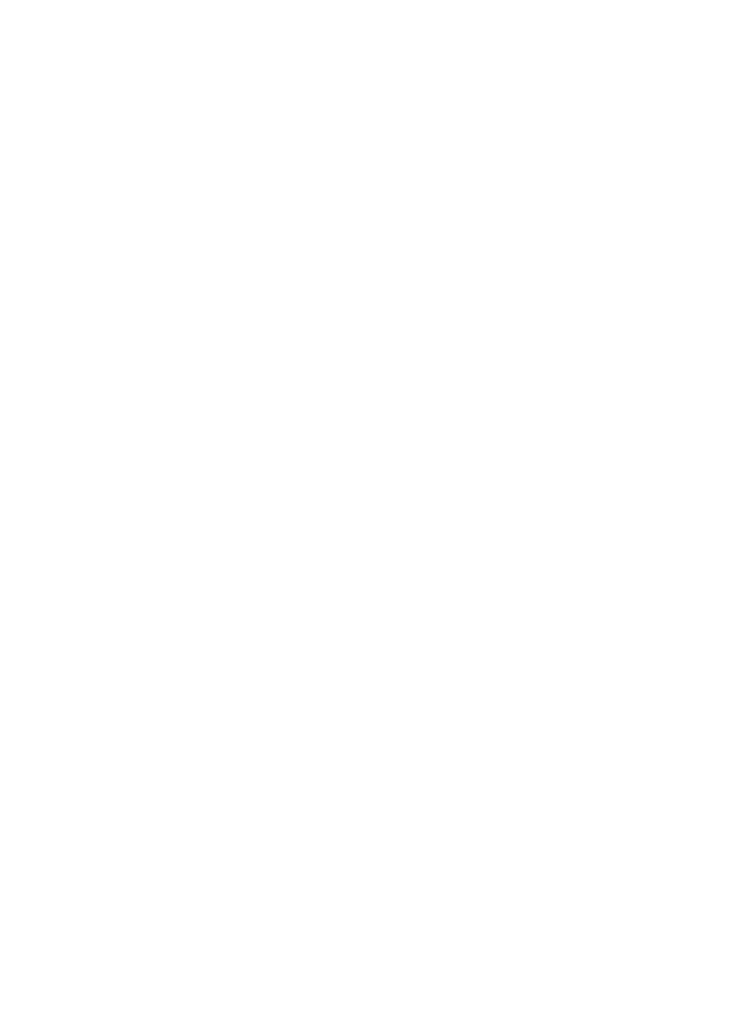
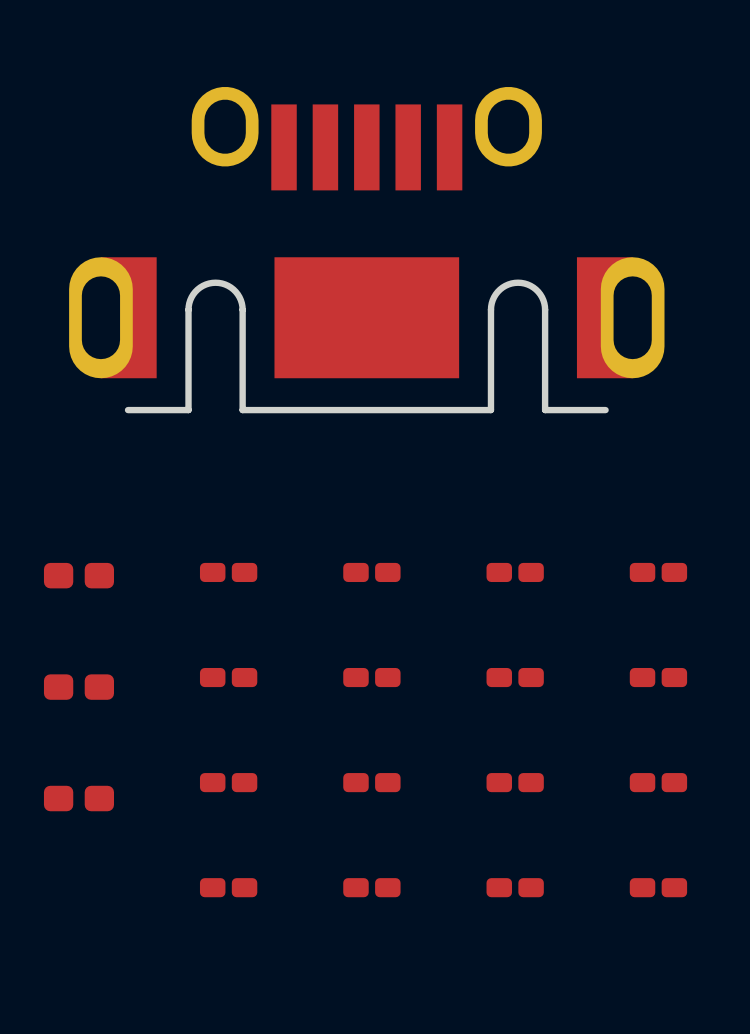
part: none -> (366, 250)
part: none -> (228, 572)
part: none -> (371, 572)
part: none -> (515, 572)
part: none -> (658, 572)
part: none -> (78, 575)
part: none -> (228, 677)
part: none -> (371, 677)
part: none -> (515, 677)
part: none -> (658, 677)
part: none -> (78, 687)
part: none -> (228, 782)
part: none -> (371, 782)
part: none -> (515, 782)
part: none -> (658, 782)
part: none -> (78, 798)
part: none -> (228, 887)
part: none -> (371, 887)
part: none -> (515, 887)
part: none -> (658, 887)

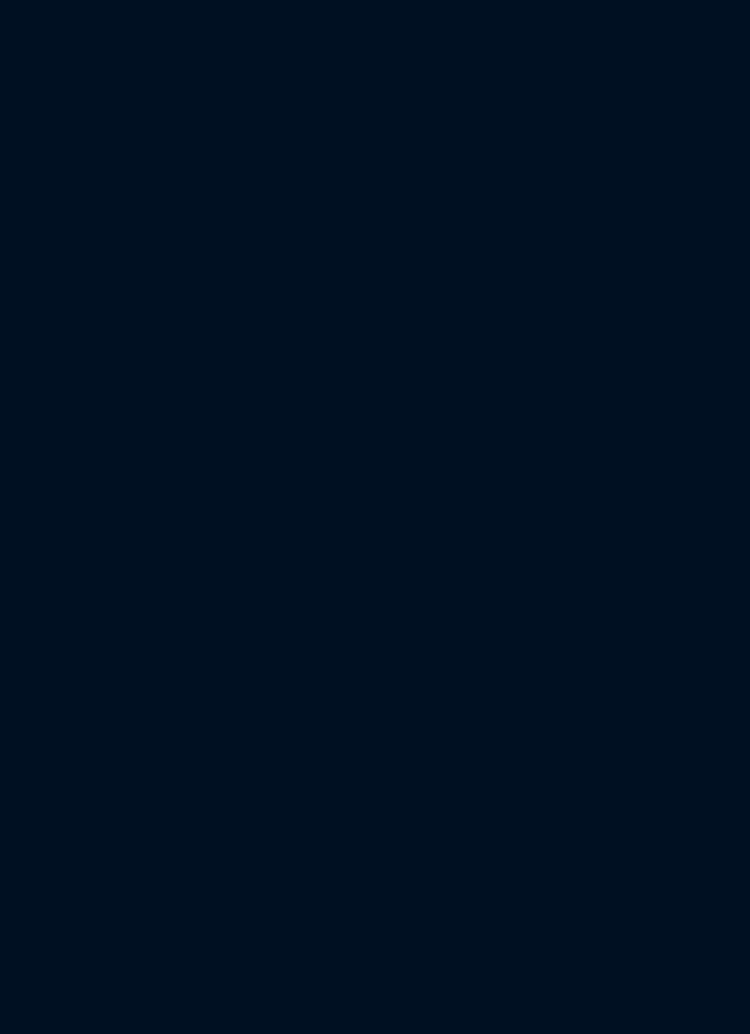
part: (366, 250) -> none
part: (228, 572) -> none
part: (371, 572) -> none
part: (515, 572) -> none
part: (658, 572) -> none
part: (78, 575) -> none
part: (228, 677) -> none
part: (371, 677) -> none
part: (515, 677) -> none
part: (658, 677) -> none
part: (78, 687) -> none
part: (228, 782) -> none
part: (371, 782) -> none
part: (515, 782) -> none
part: (658, 782) -> none
part: (78, 798) -> none
part: (228, 887) -> none
part: (371, 887) -> none
part: (515, 887) -> none
part: (658, 887) -> none

